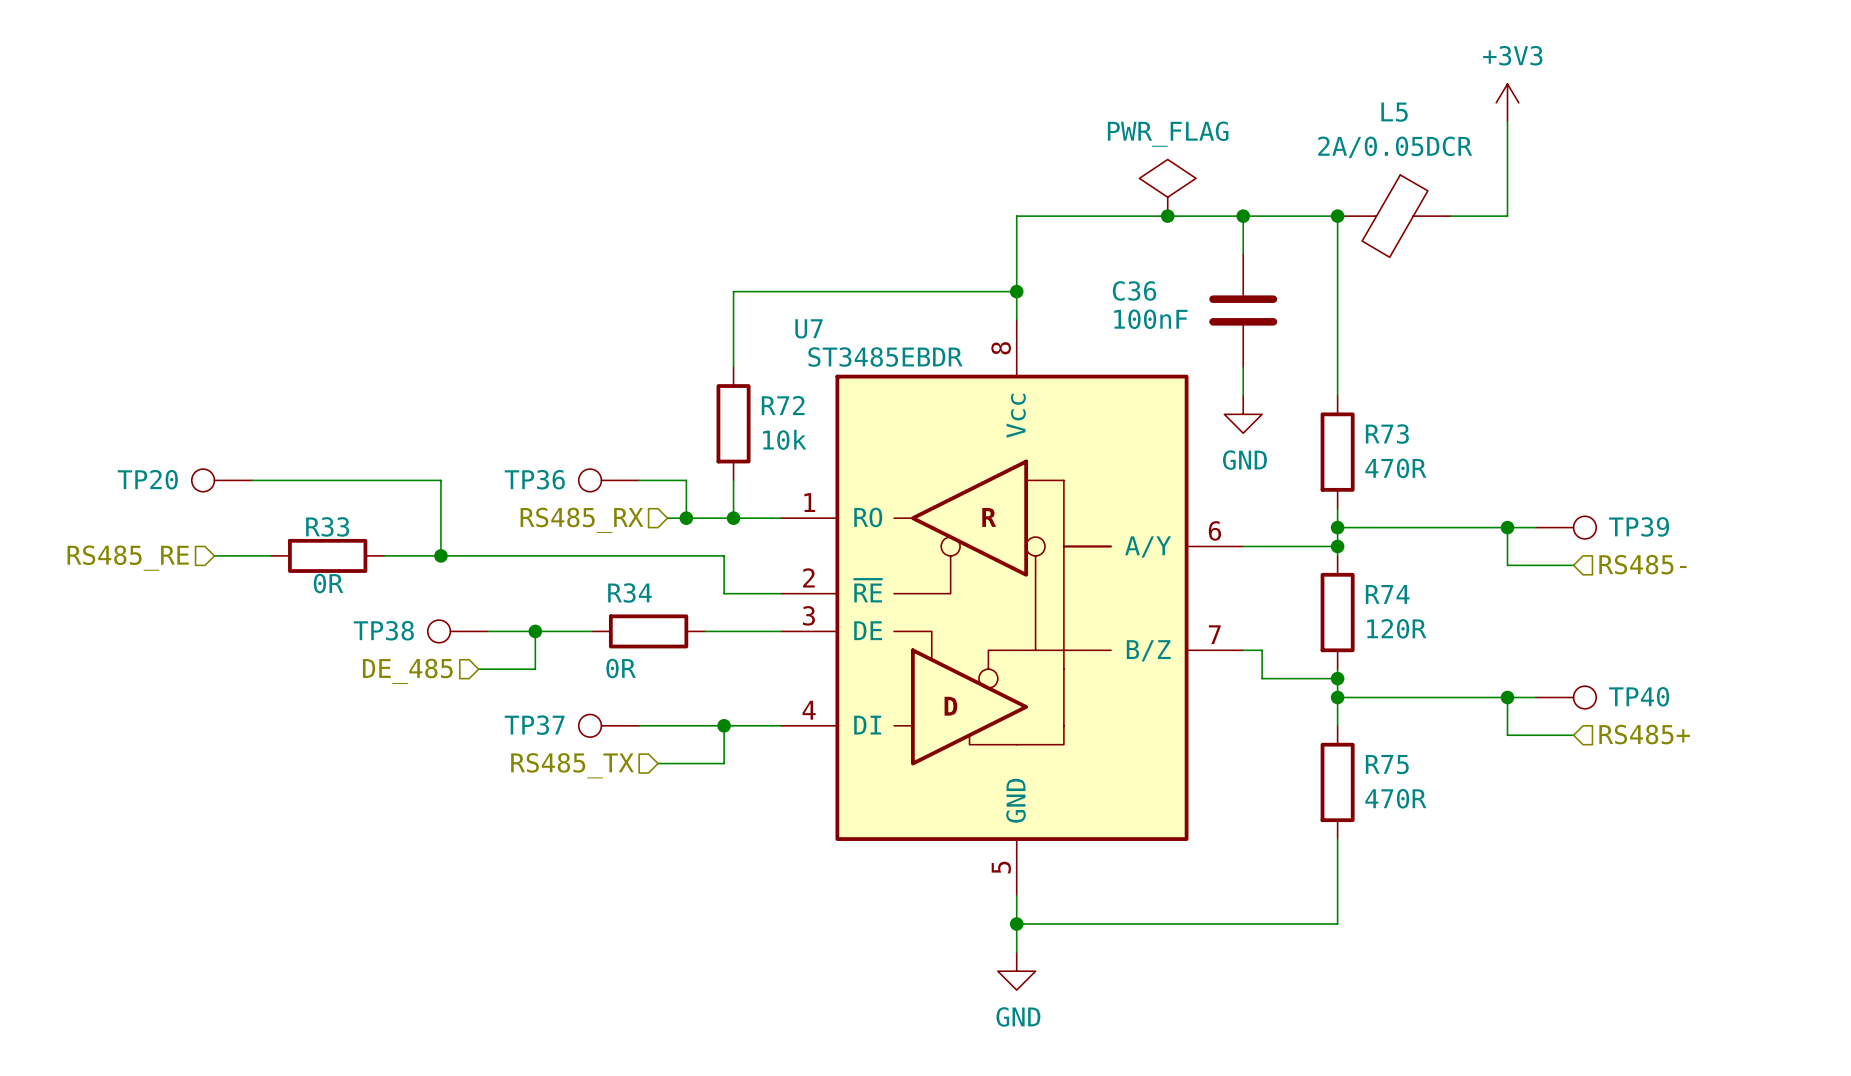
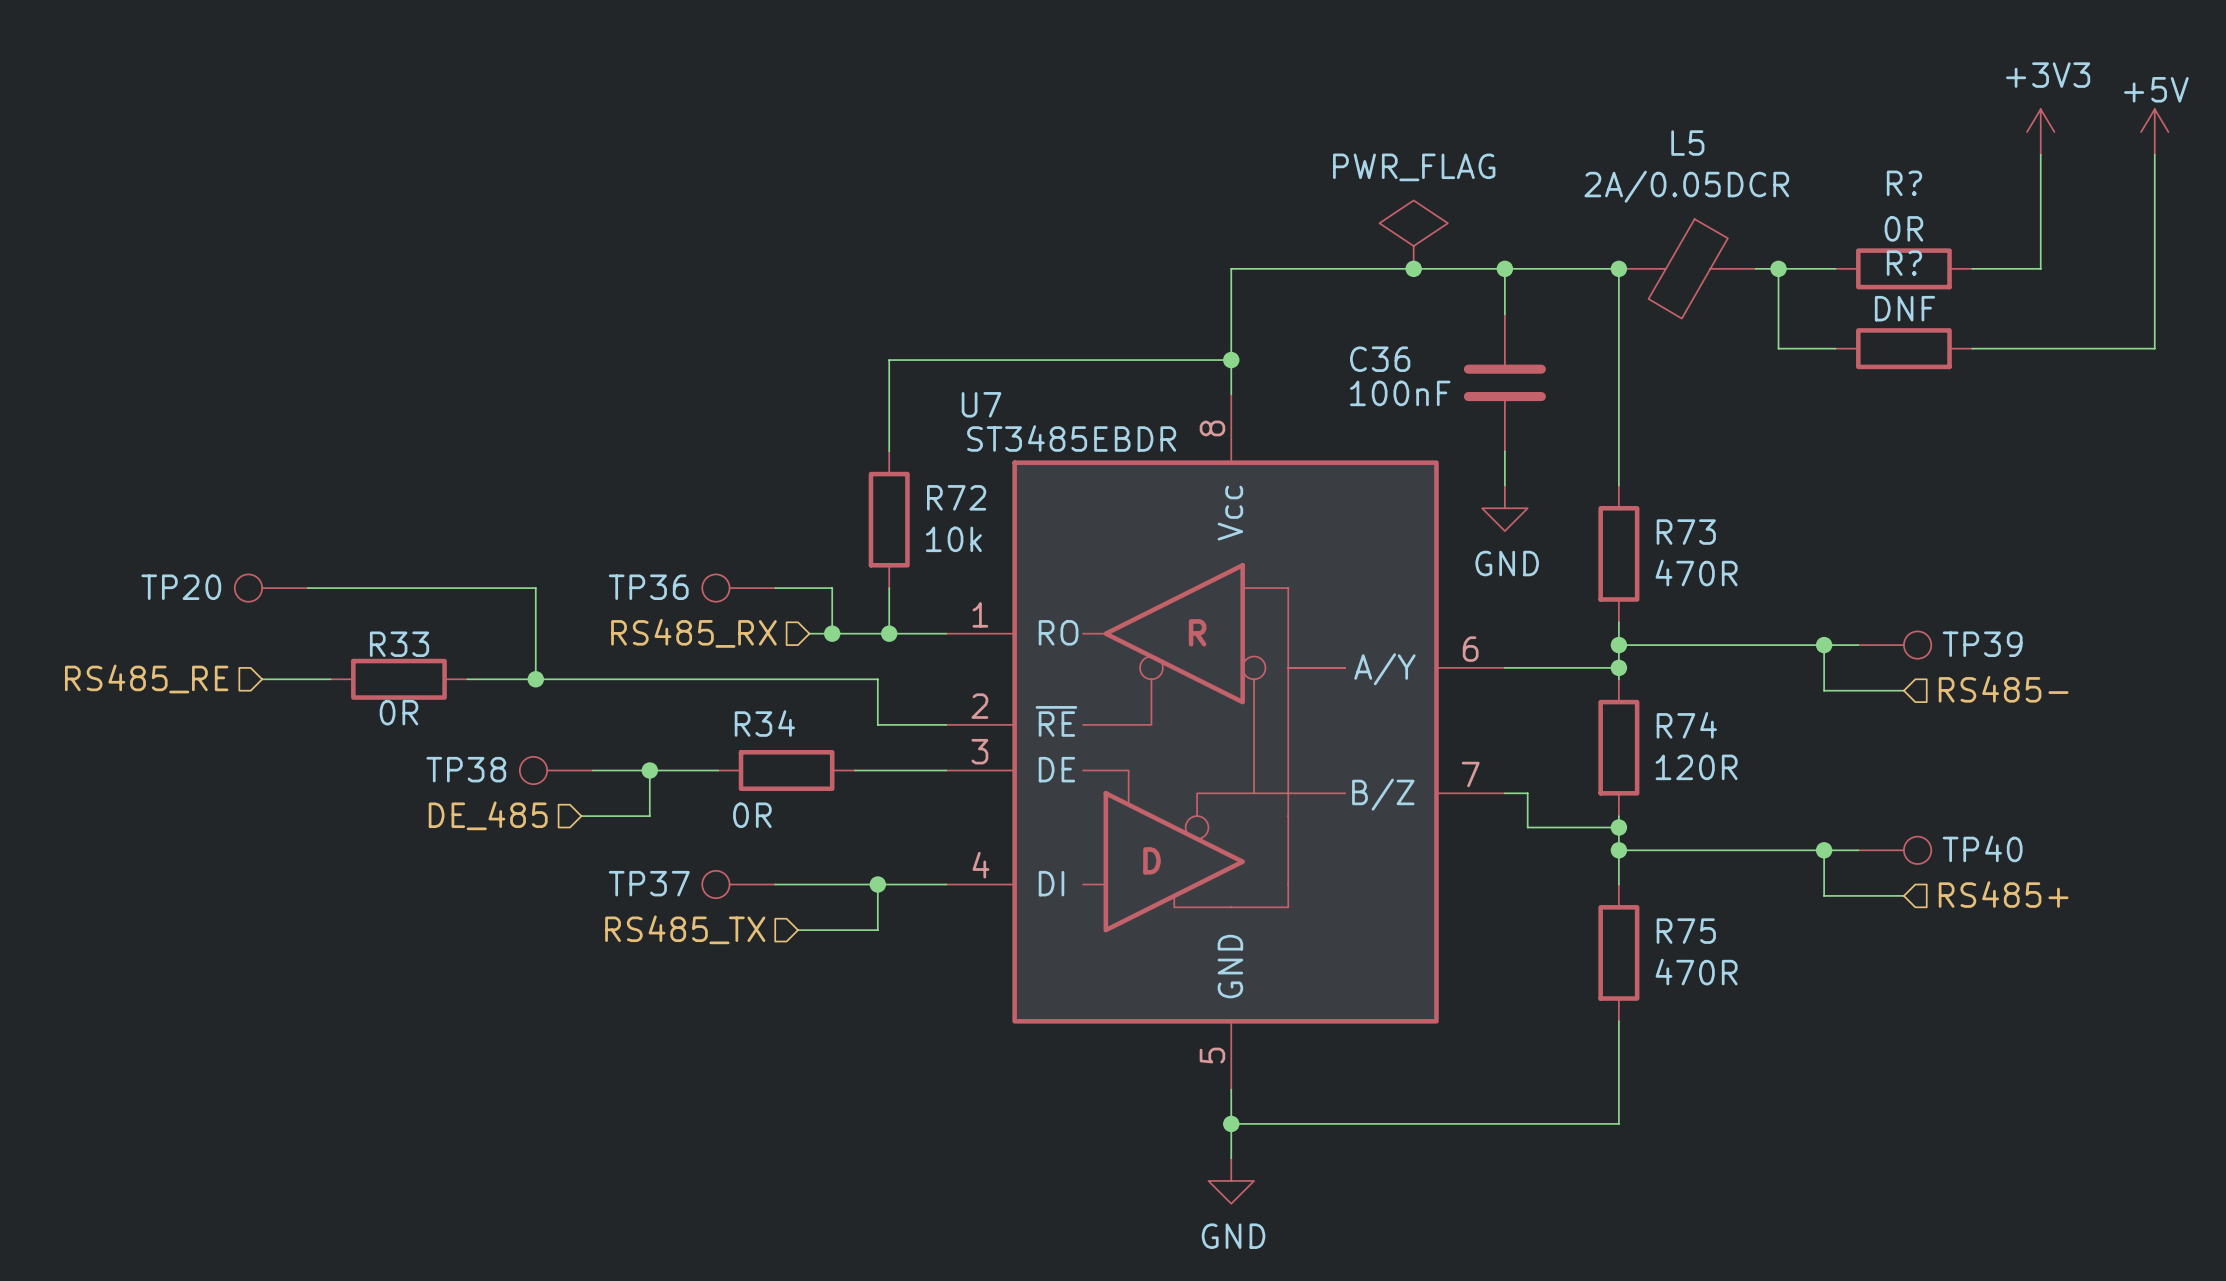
power symbol position: +3V3 (1507, 102) -> +3V3 (2040, 132)
power symbol: none -> +5V (2154, 132)
wire: (1507, 121) (1507, 216) -> (1835, 268) (1824, 268)
wire: none -> (2040, 154) (2040, 268) (1972, 268)
wire: none -> (2154, 154) (2154, 348) (1972, 348)
wire: none -> (1778, 268) (1778, 348) (1835, 348)
junction: none -> (1778, 268)
R?: none -> 0R (1903, 268)
R?: none -> DNF (1903, 348)

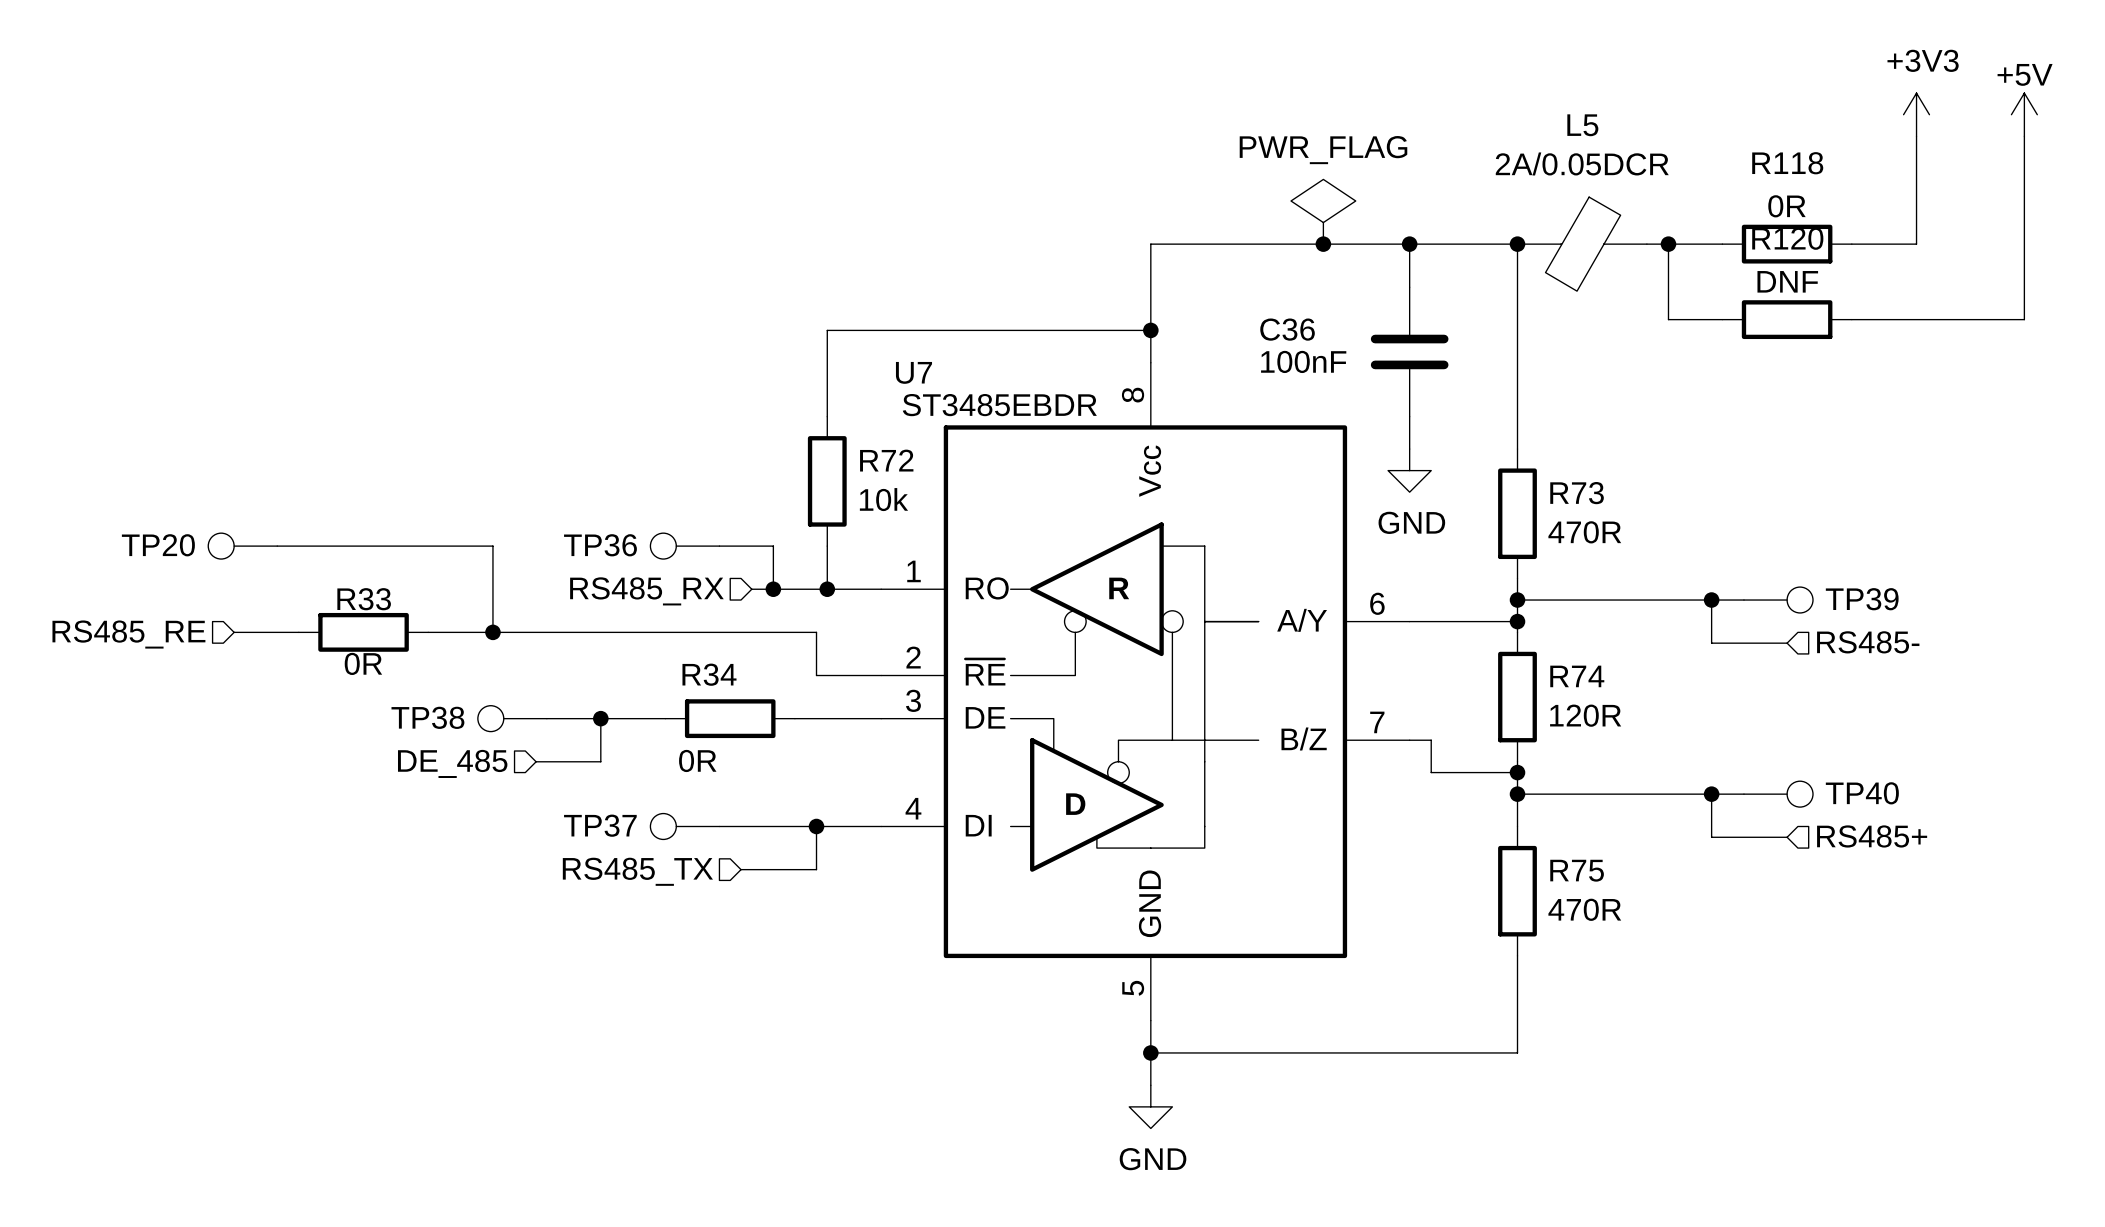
R? name: R? (1904, 183) -> R118 (1787, 163)
R? name: R? (1904, 263) -> R120 (1787, 238)

